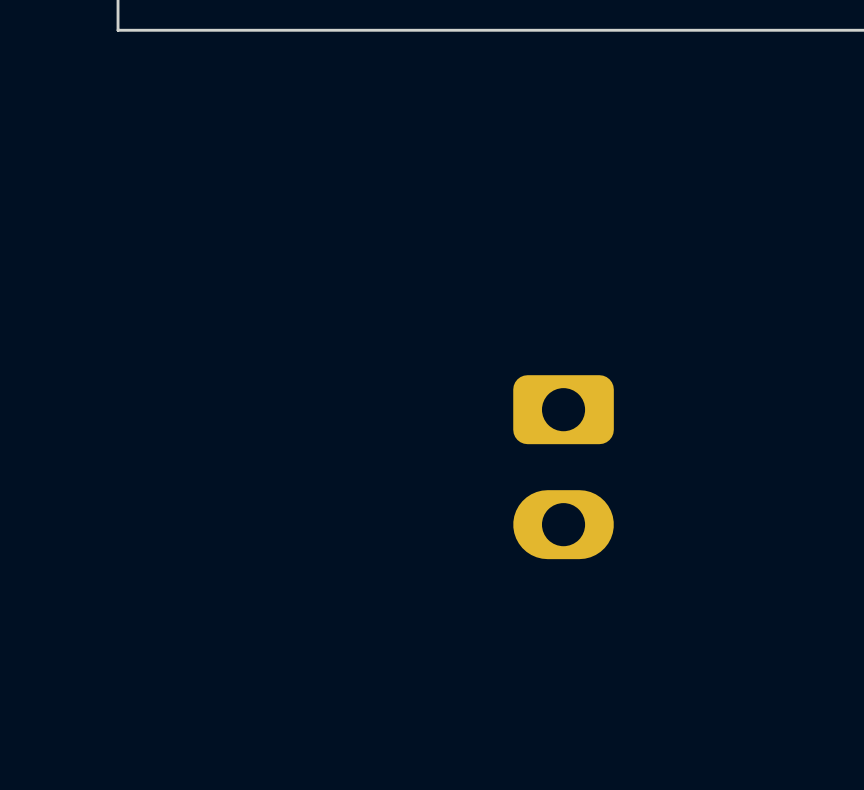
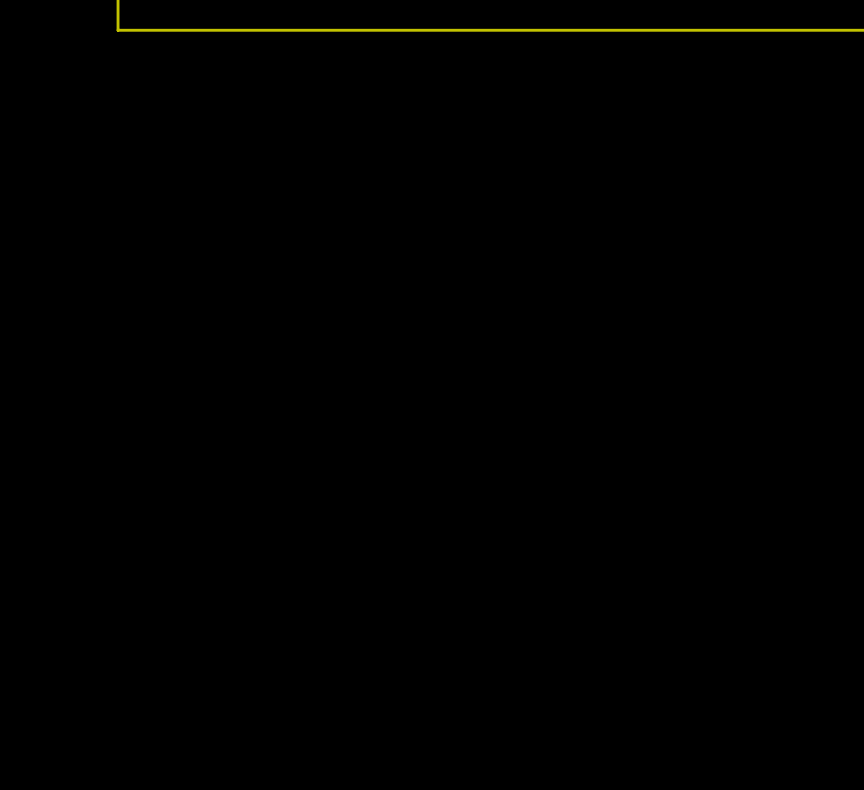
part: (563, 467) -> none

